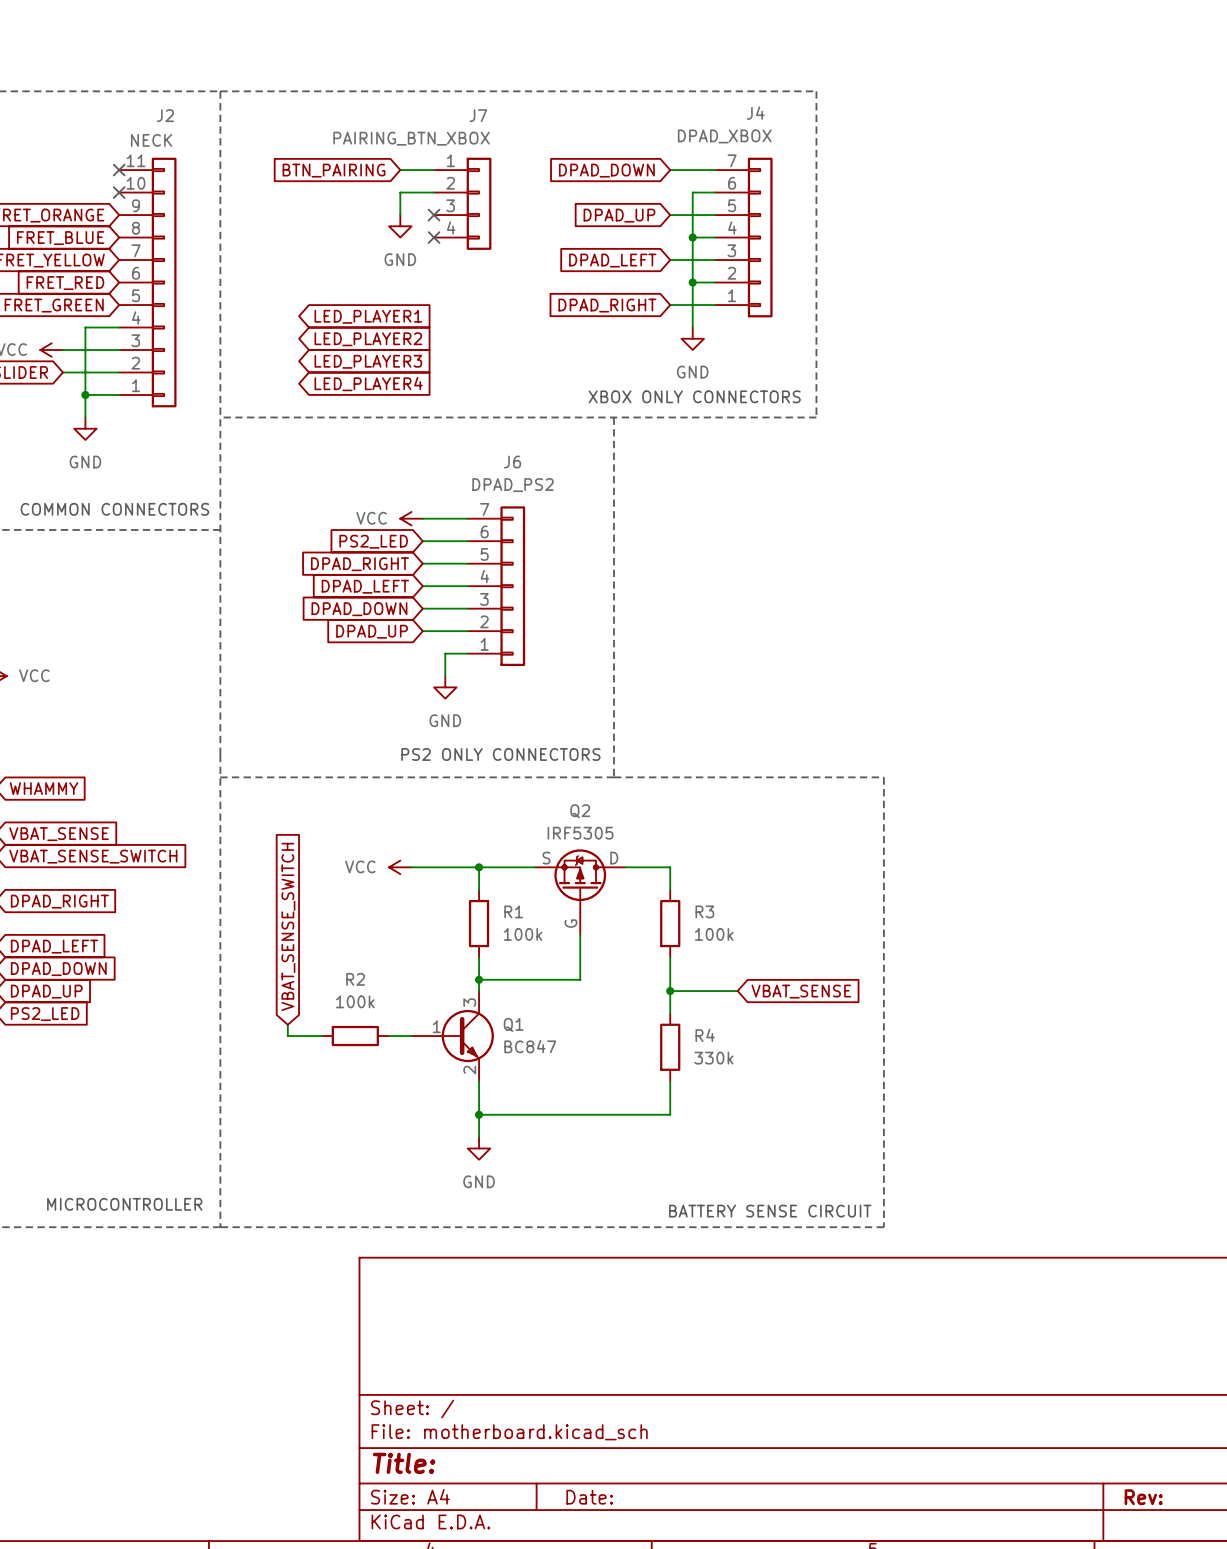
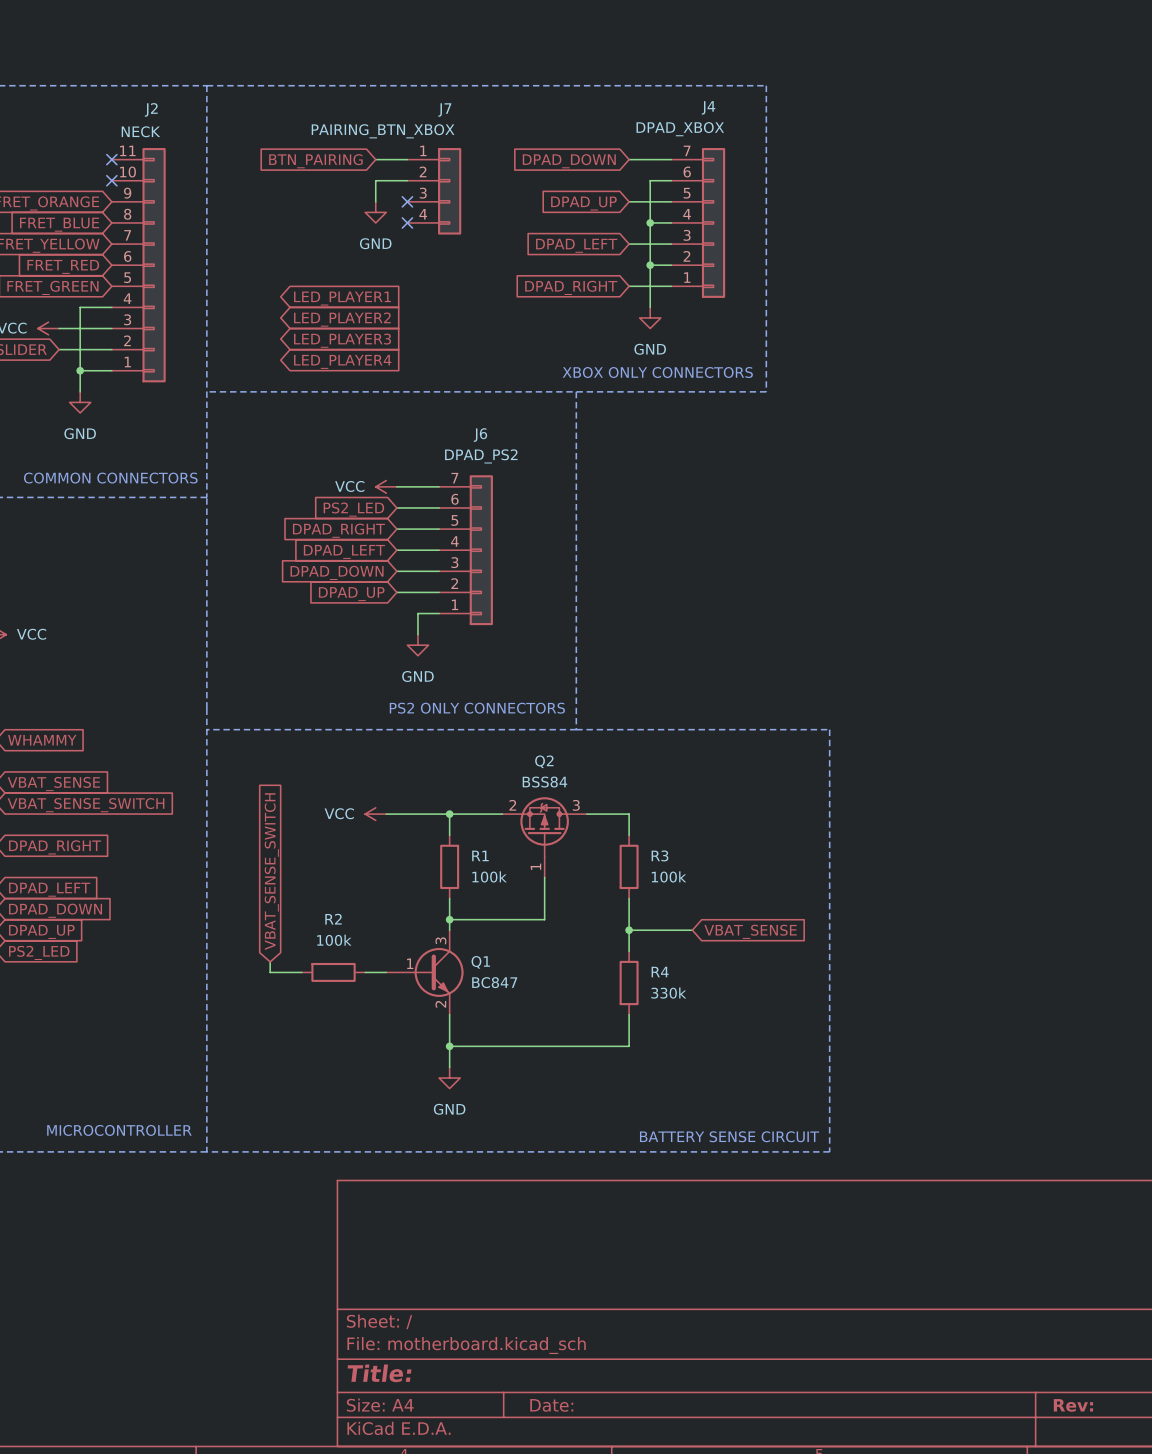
Q2 value: IRF5305 (580, 833) -> BSS84 (544, 782)
Q2 pin name: S (546, 858) -> none
Q2 pin number: none -> 2 (512, 805)
Q2 pin number: none -> 3 (576, 805)
Q2 pin name: D (614, 858) -> none
Q2 pin name: G (570, 923) -> none
Q2 pin number: none -> 1 (535, 866)

